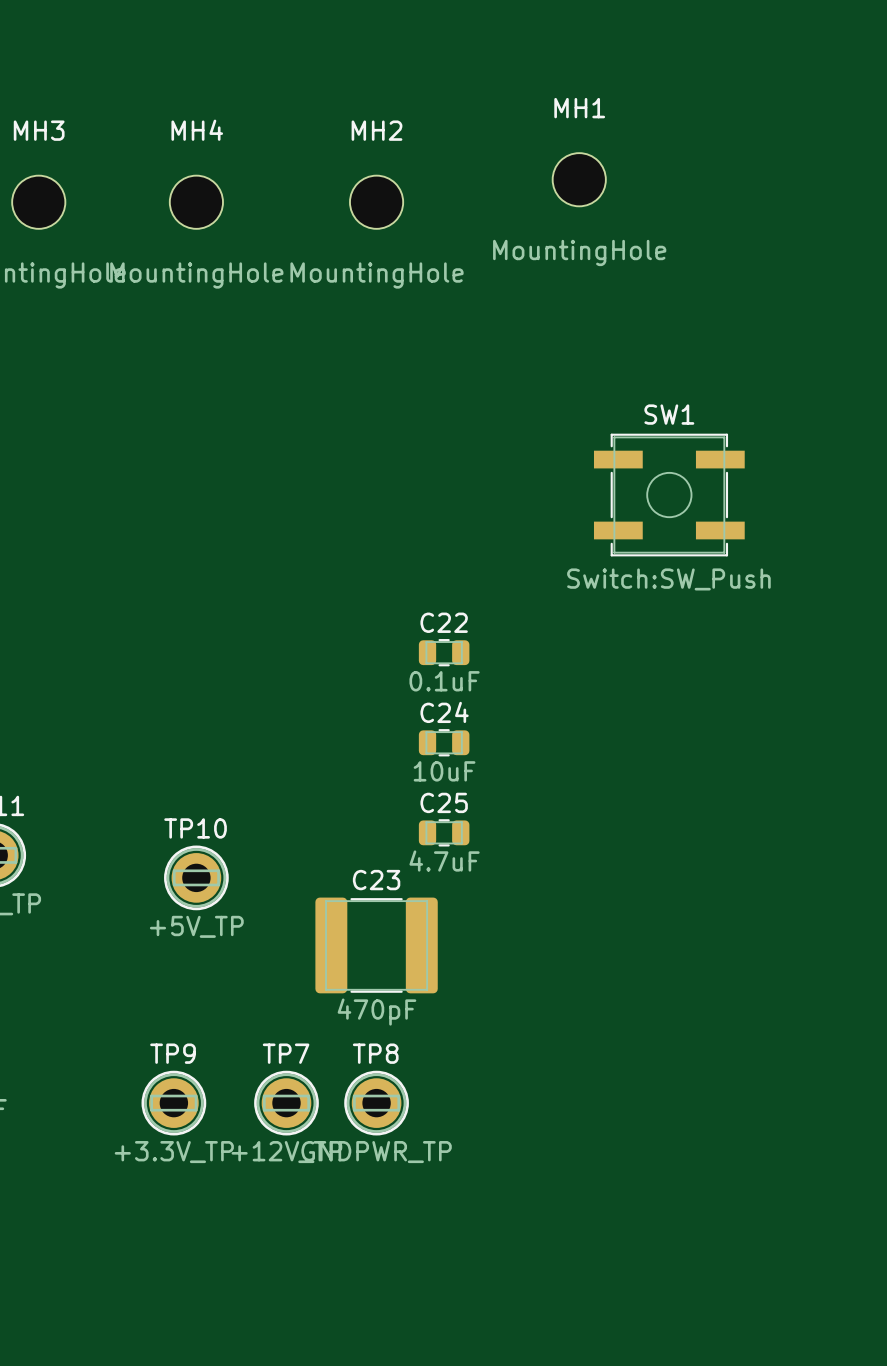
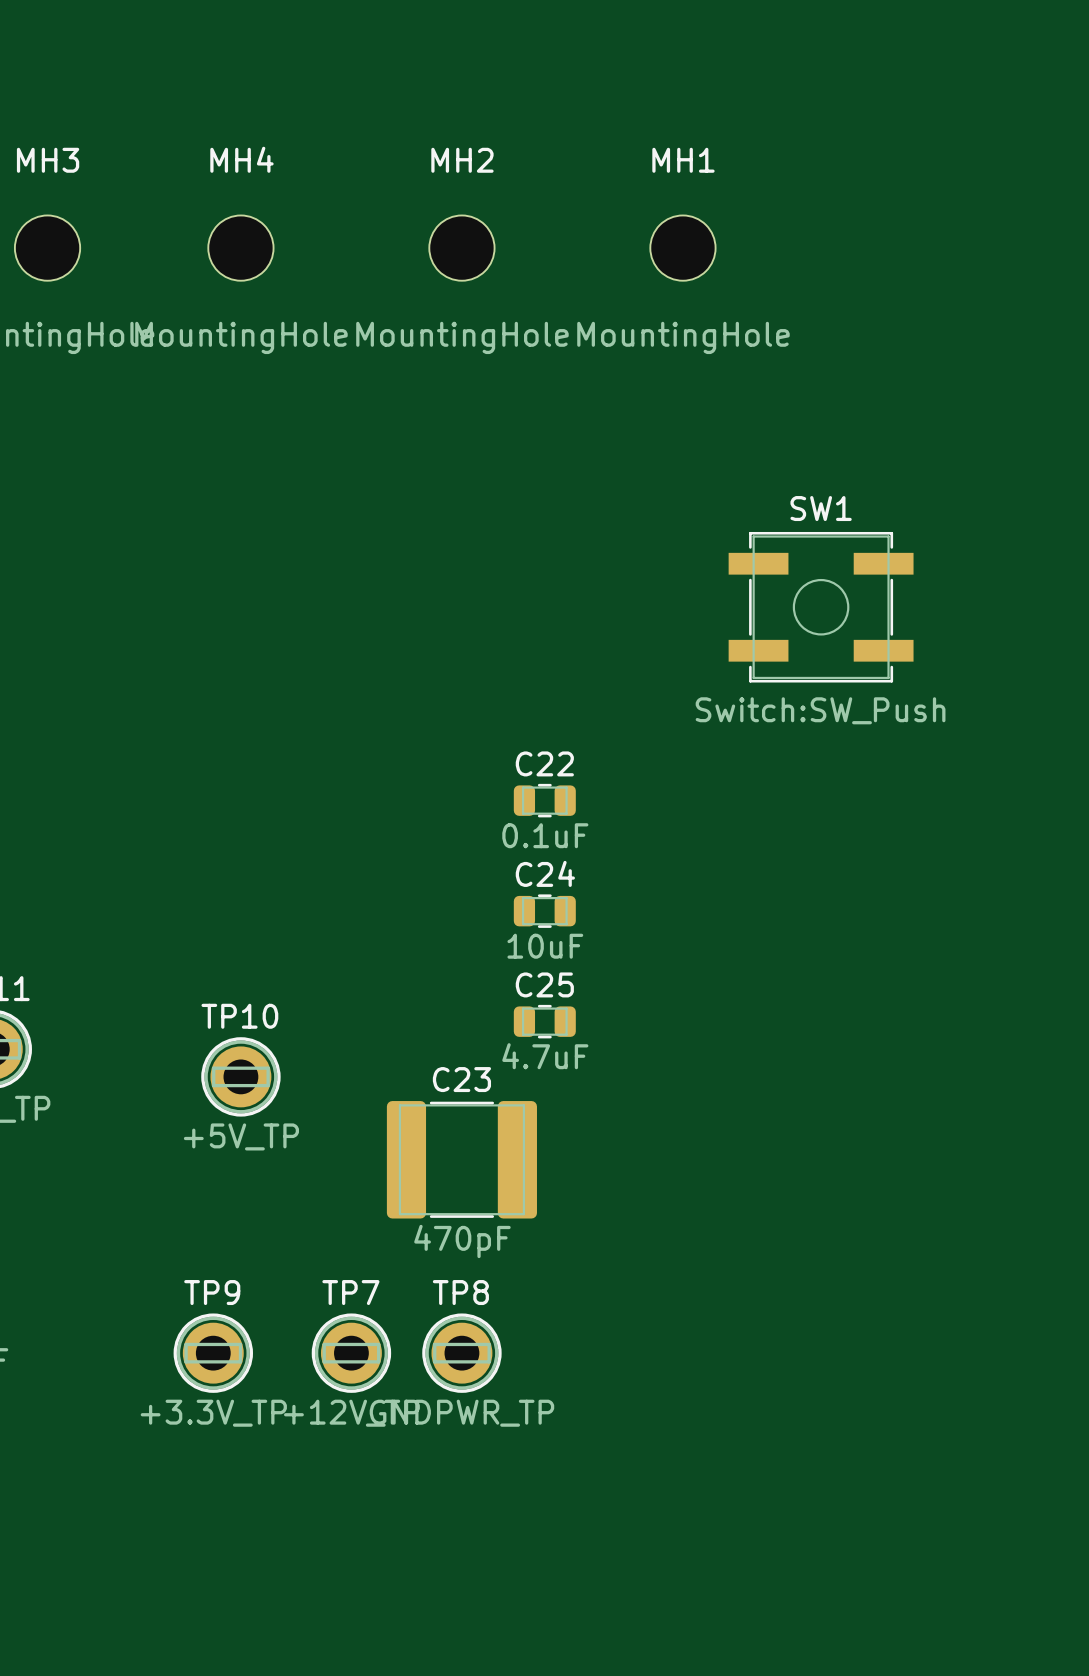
MH1 position: (579, 179) -> (682, 248)

